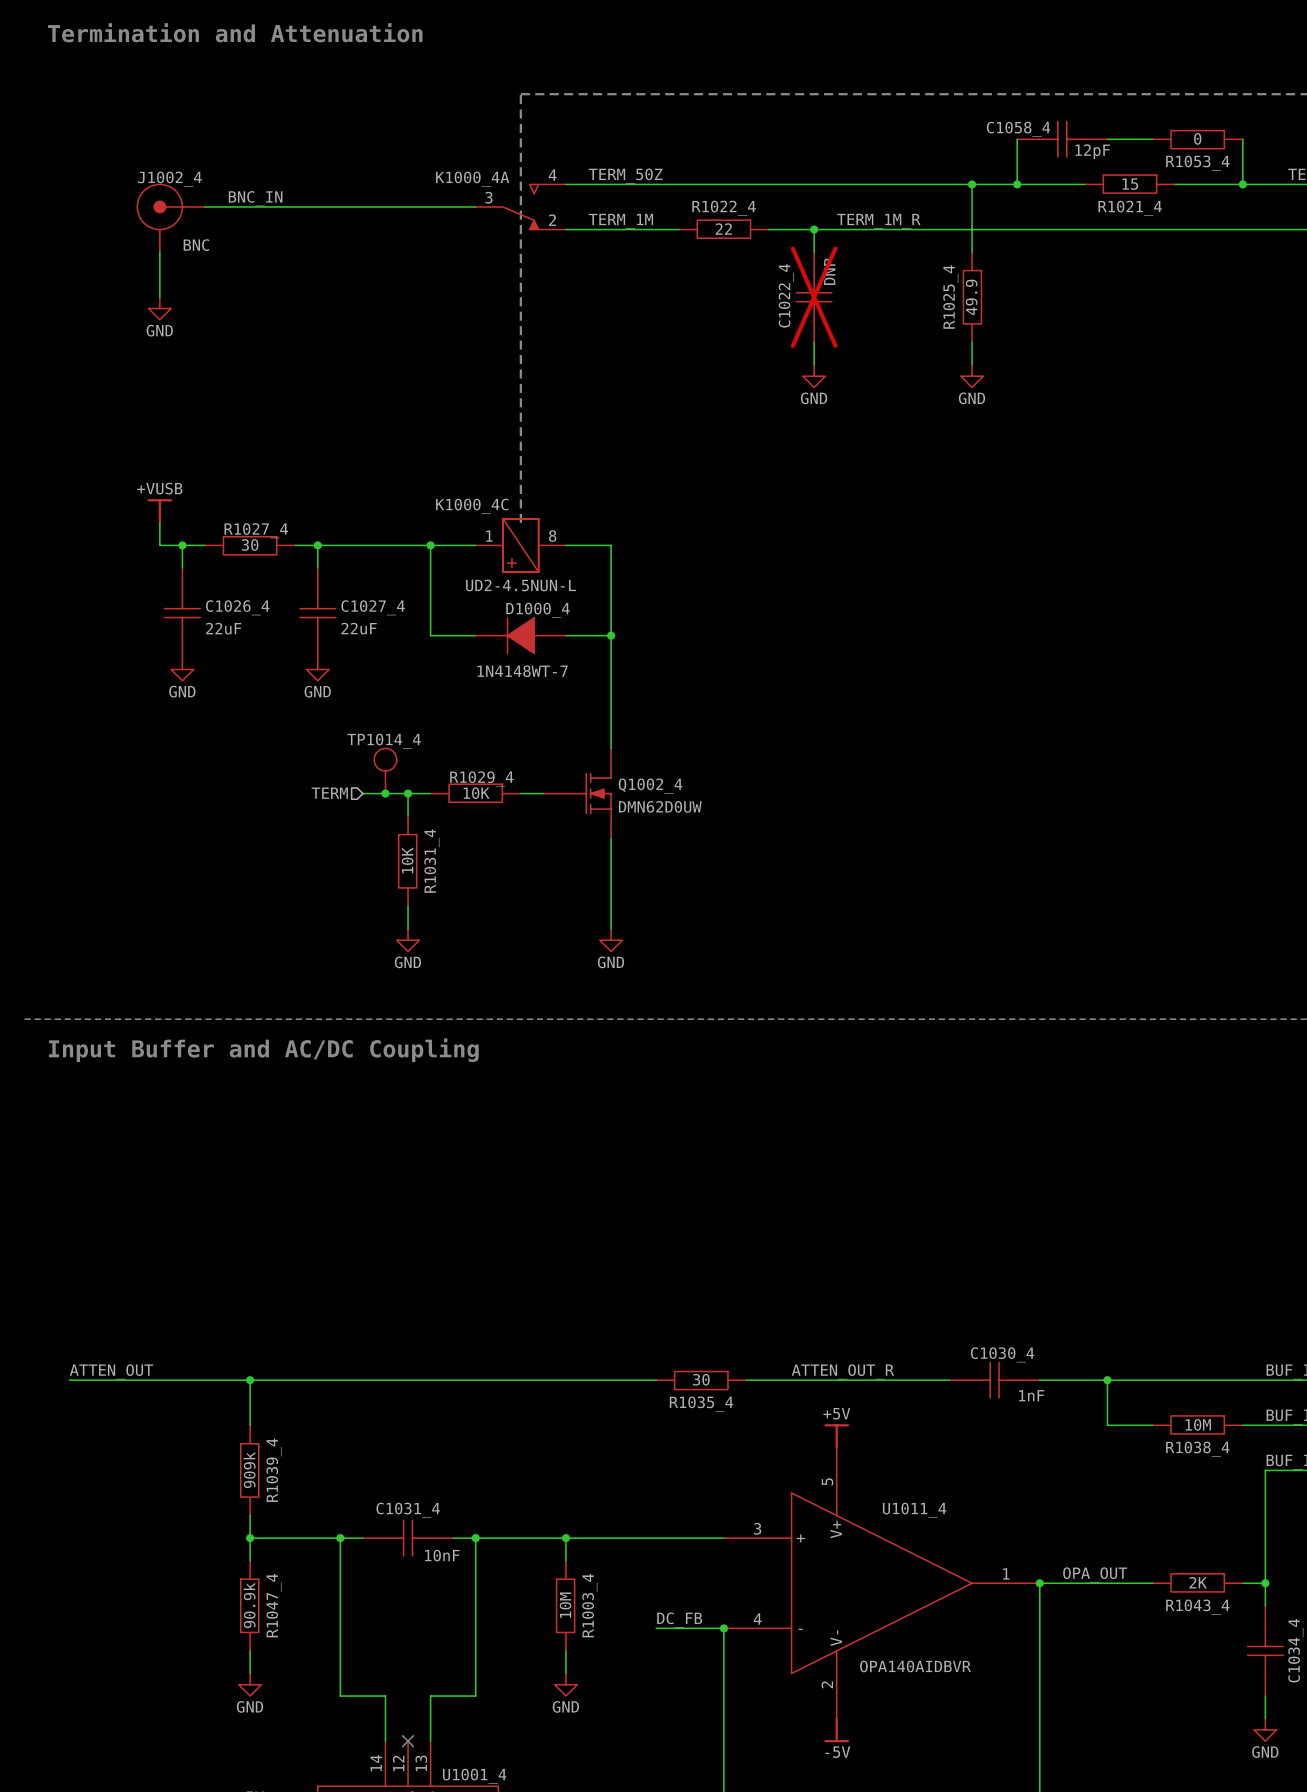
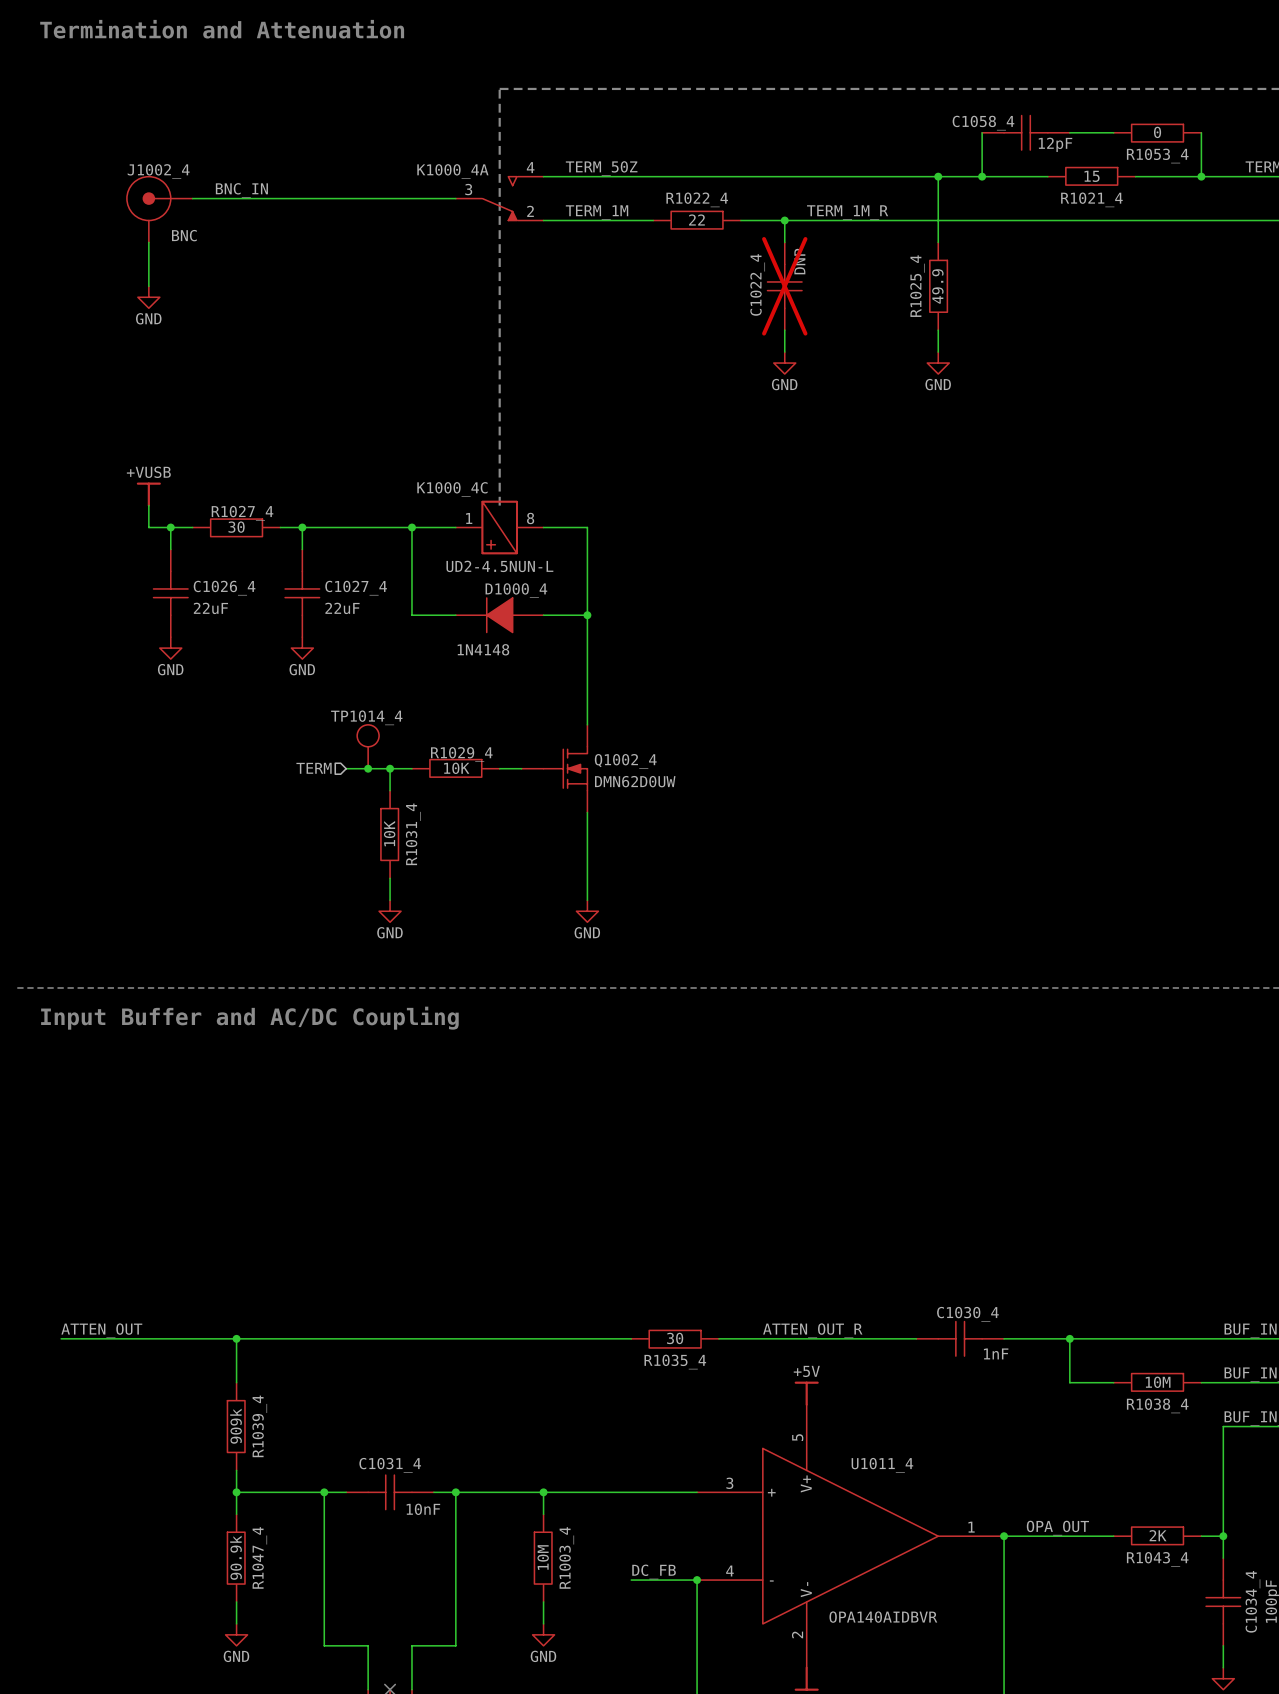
D1000_4 value: 1N4148WT-7 (522, 671) -> 1N4148 (483, 649)

